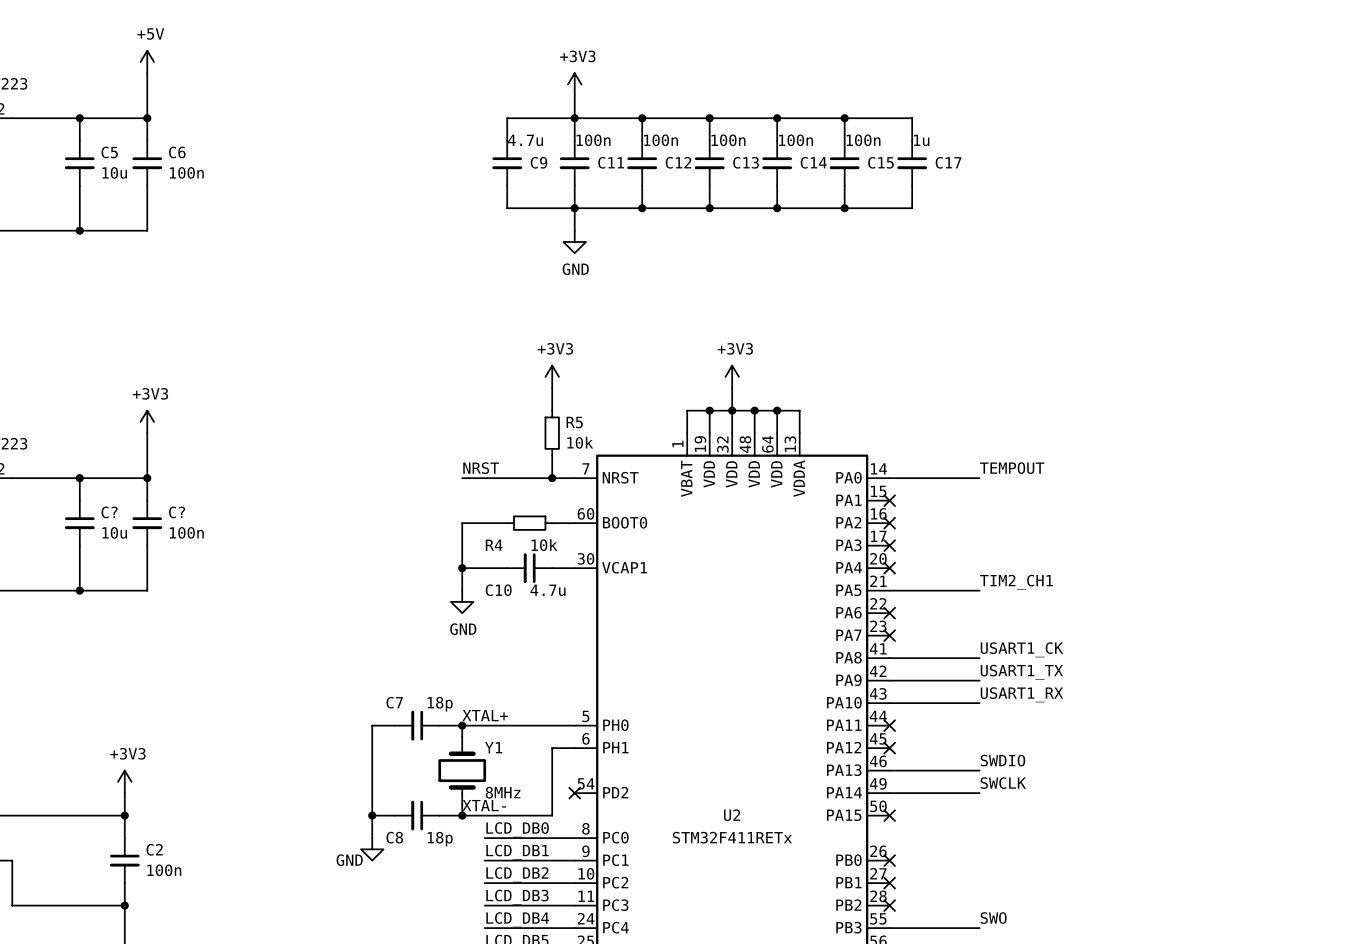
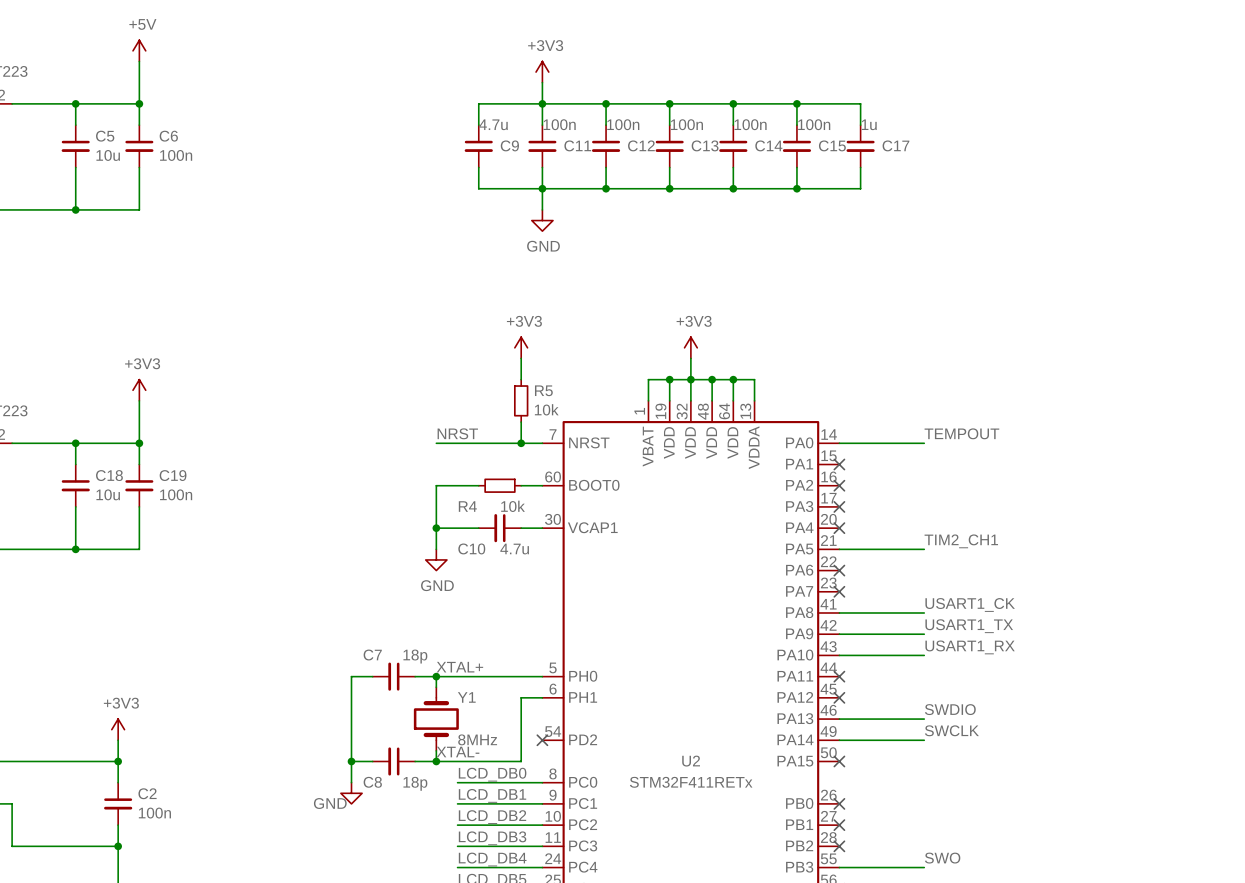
C? name: C? (109, 512) -> C18 (109, 475)
C? name: C? (177, 512) -> C19 (173, 475)

